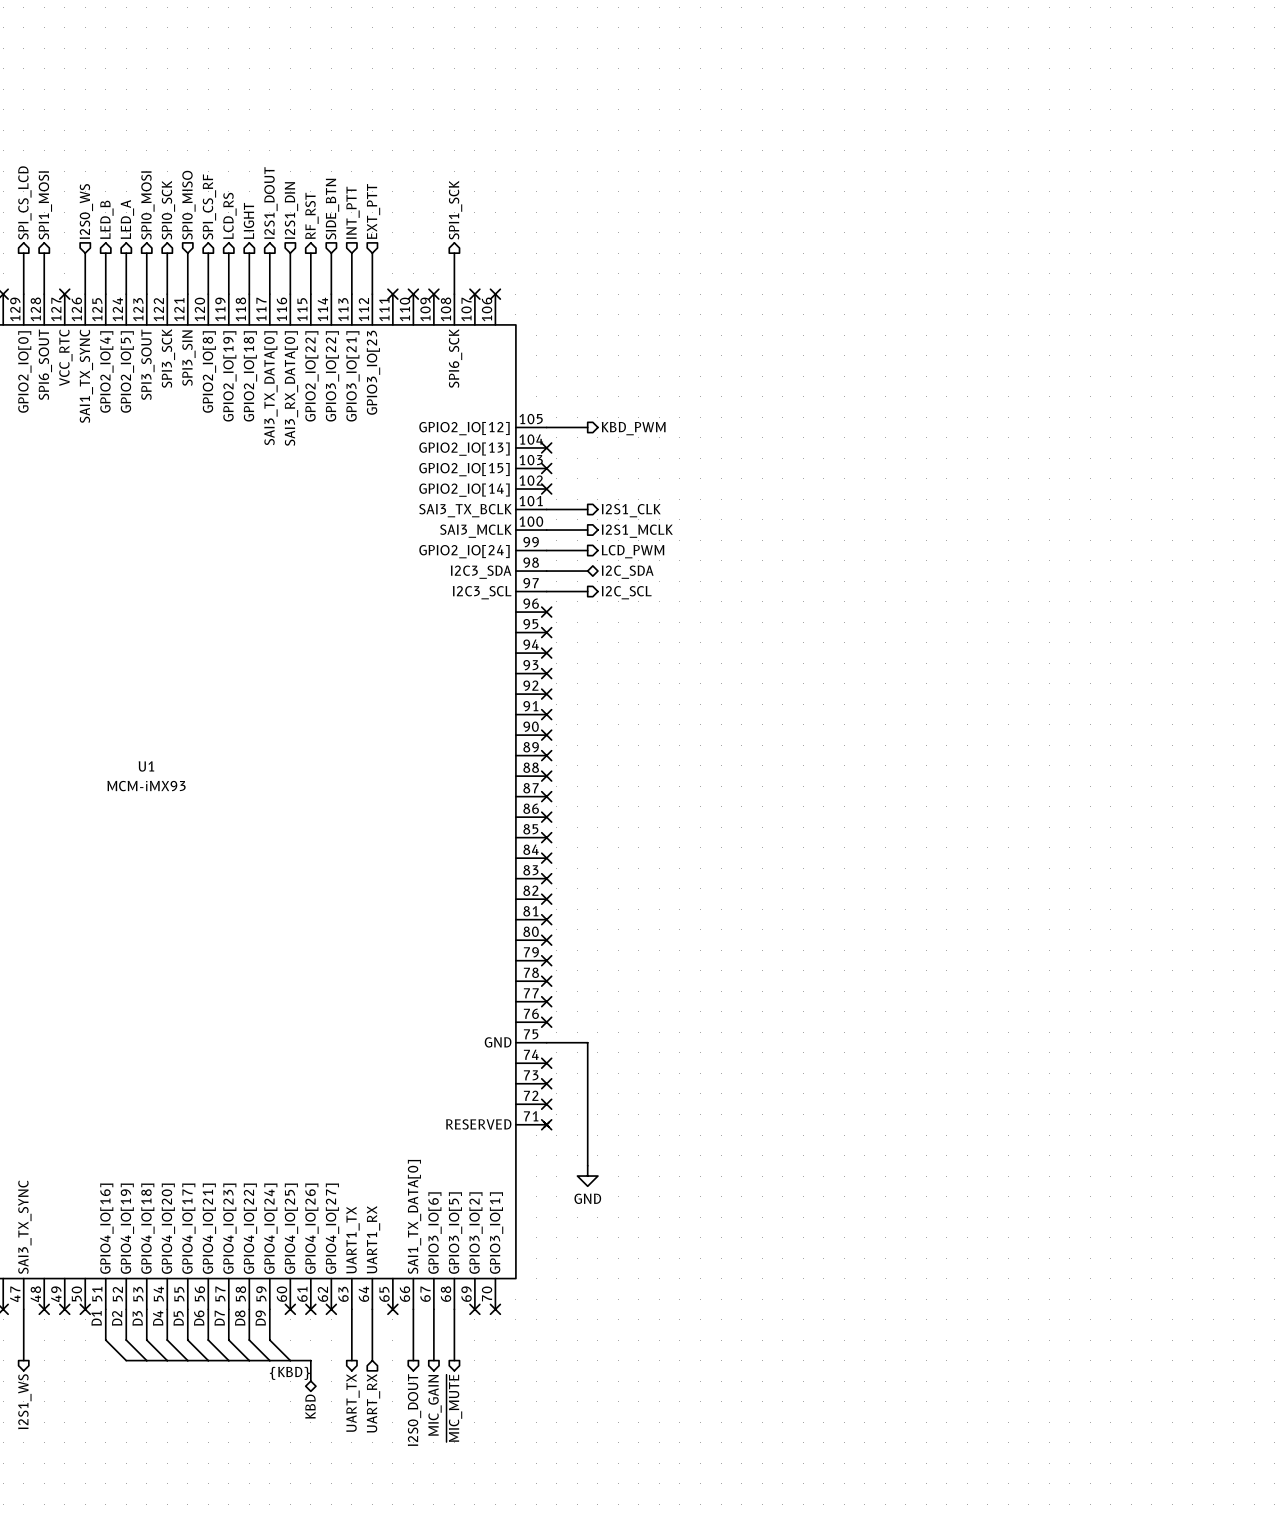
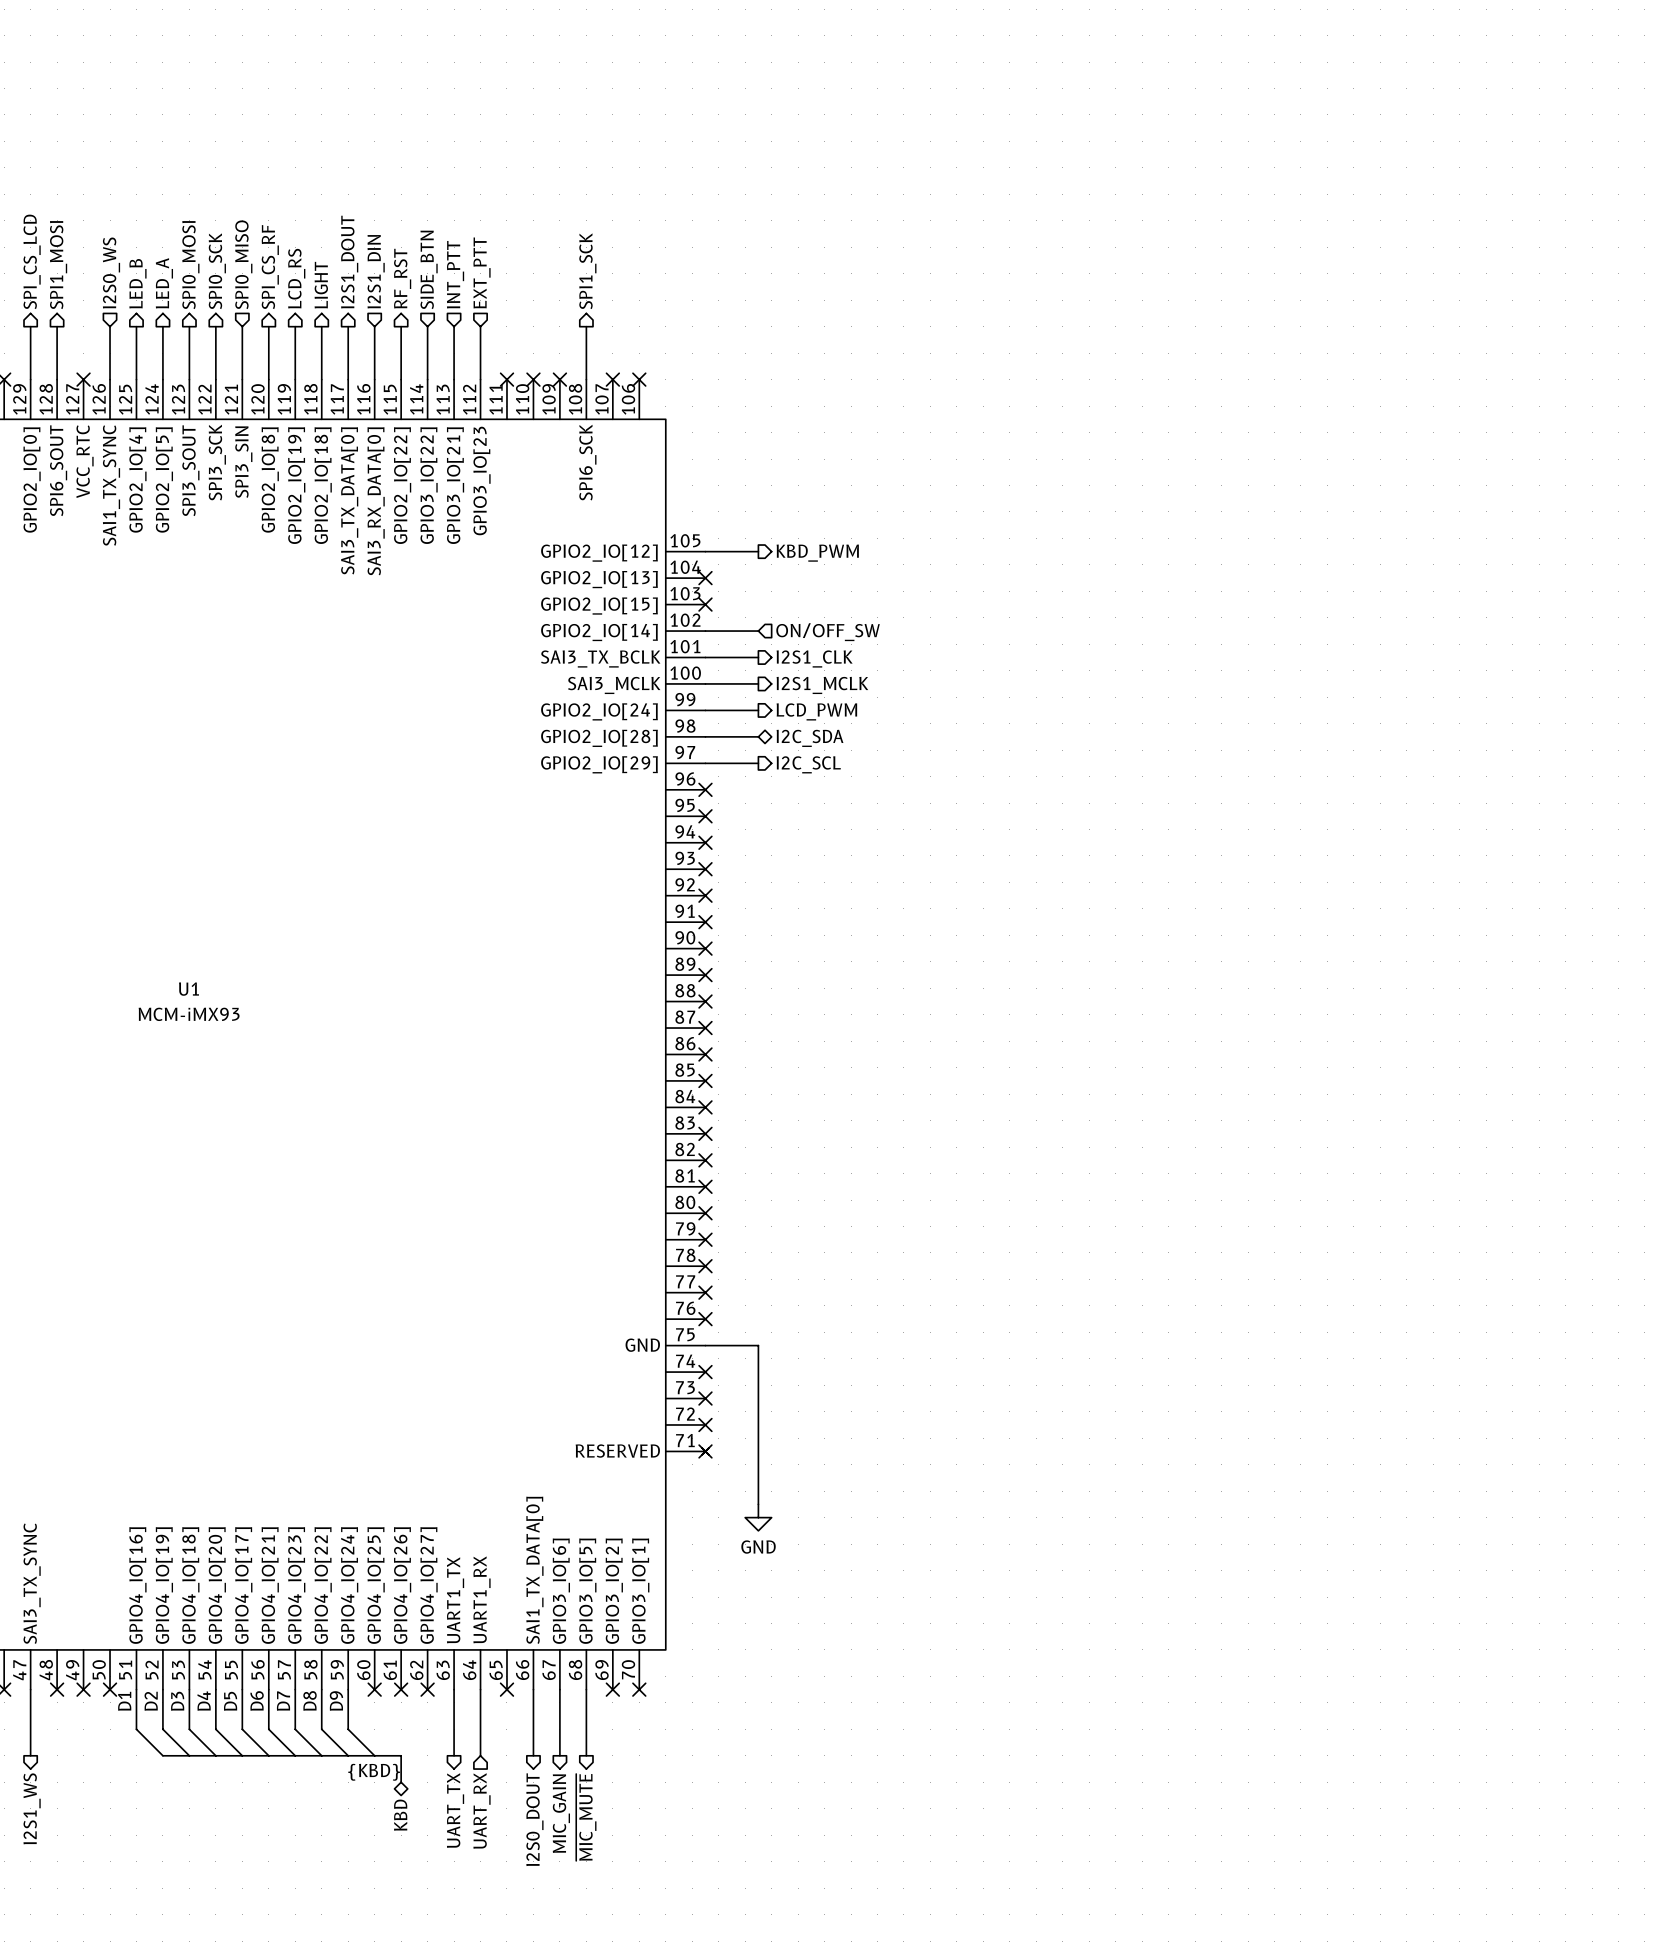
wire: none -> (705, 631) (758, 631)
no-connect mark: (546, 489) -> none
hierarchical label: none -> ON/OFF_SW (828, 632)
U1 pin name: I2C3_SDA (481, 572) -> GPIO2_IO[28] (599, 738)
U1 pin name: I2C3_SCL (482, 592) -> GPIO2_IO[29] (599, 764)

